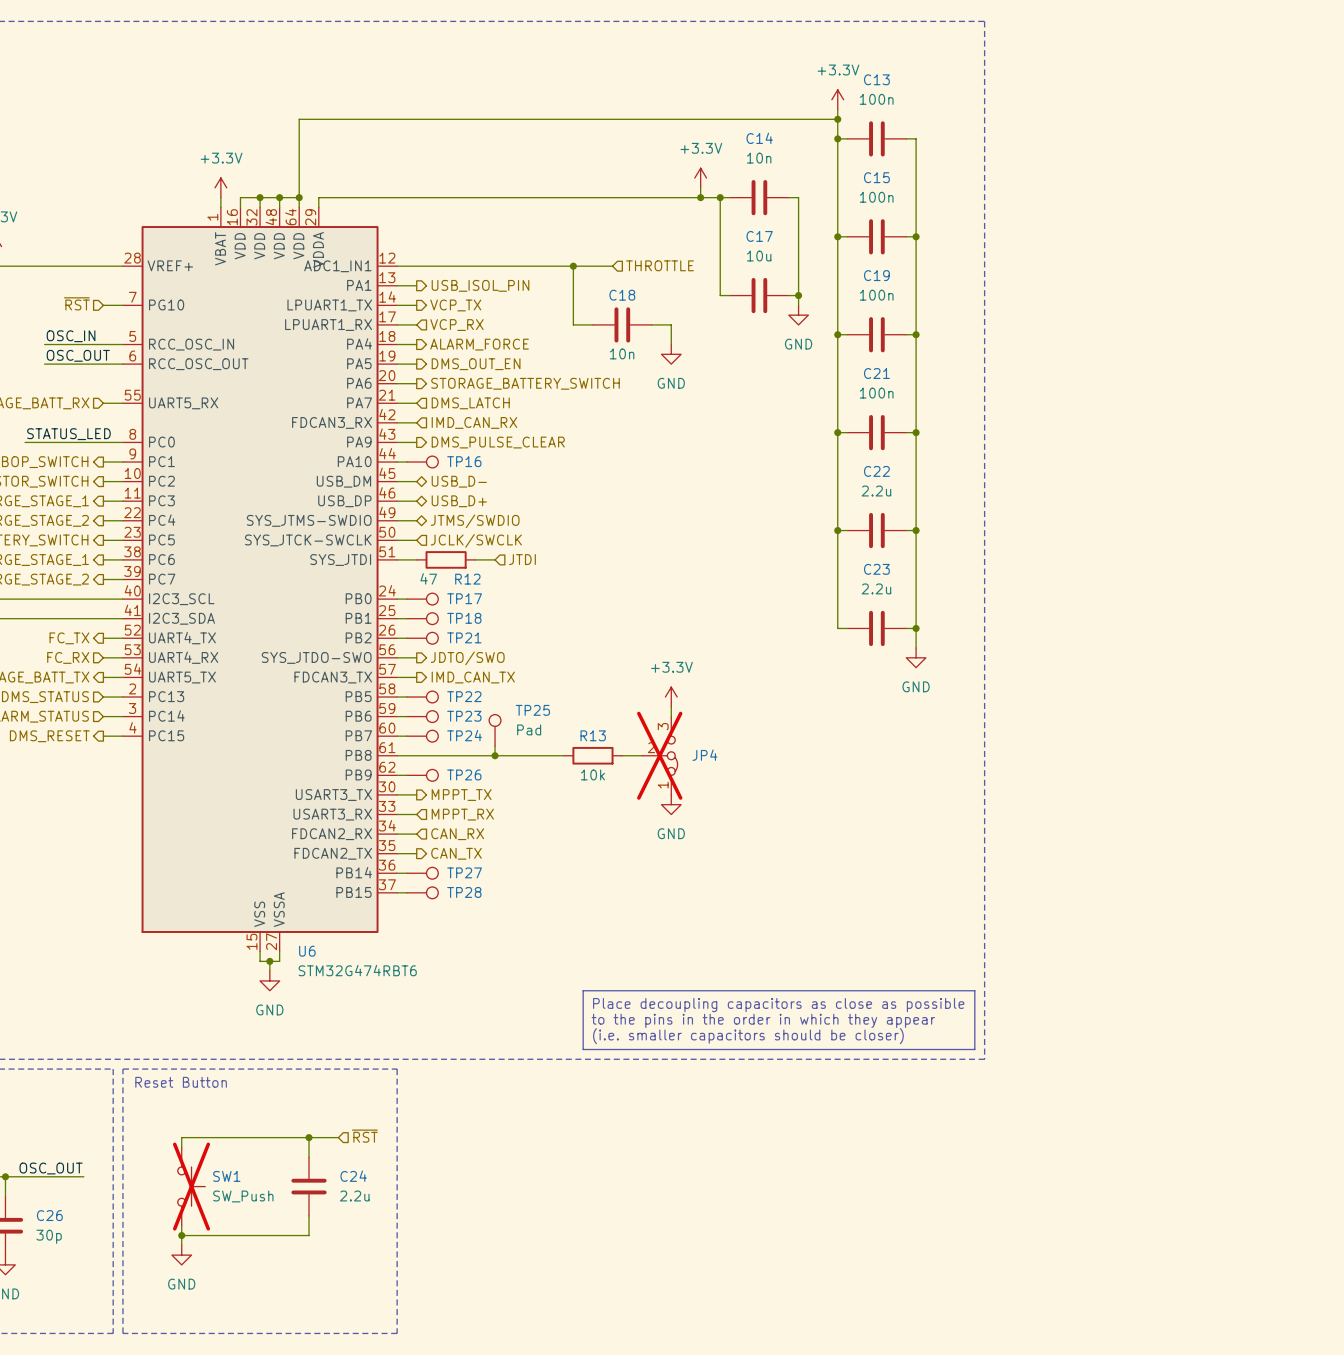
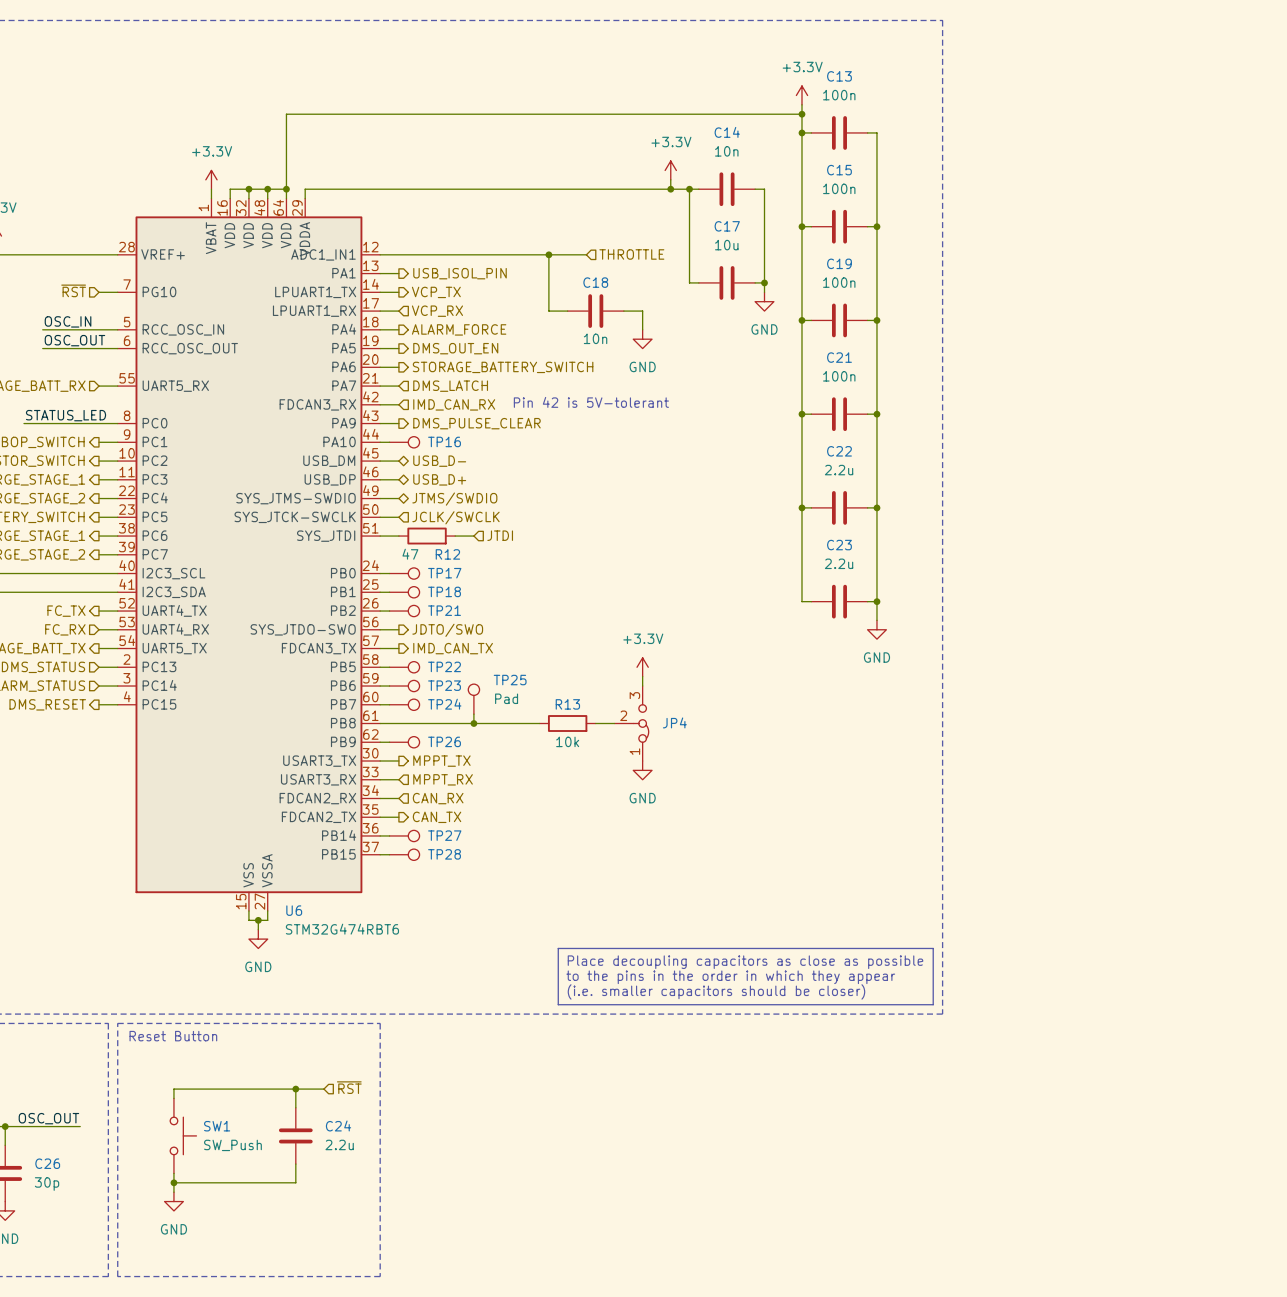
text: none -> Pin 42 is 5V-tolerant (591, 402)
JP4 do-not-place cross: (659, 755) -> none
SW1 do-not-place cross: (191, 1186) -> none

